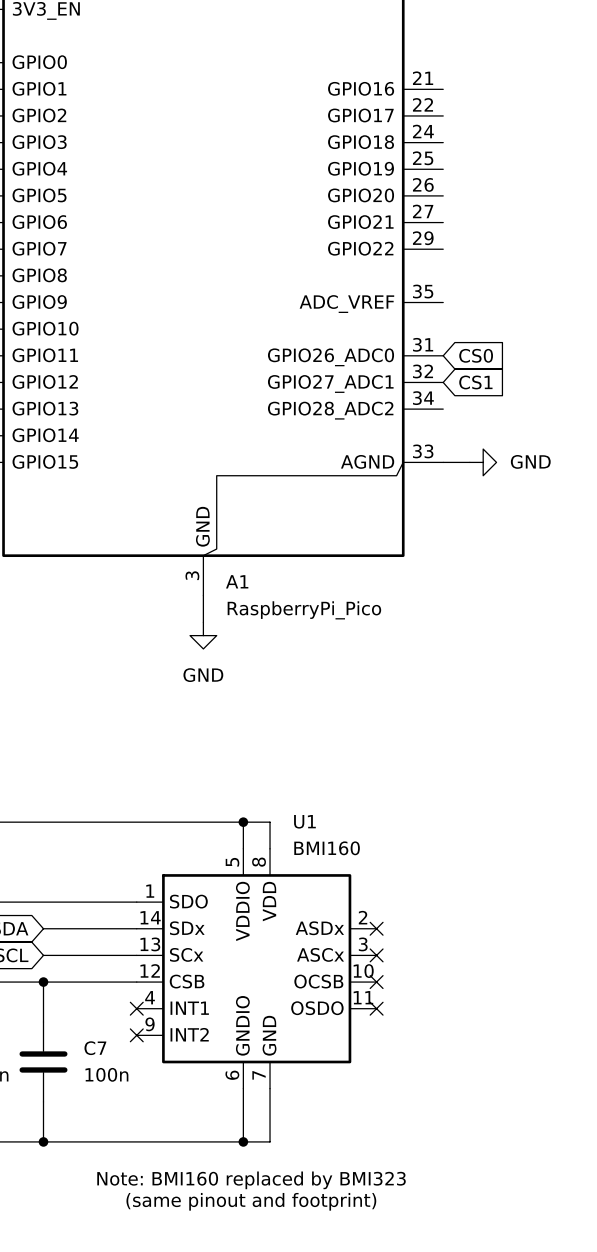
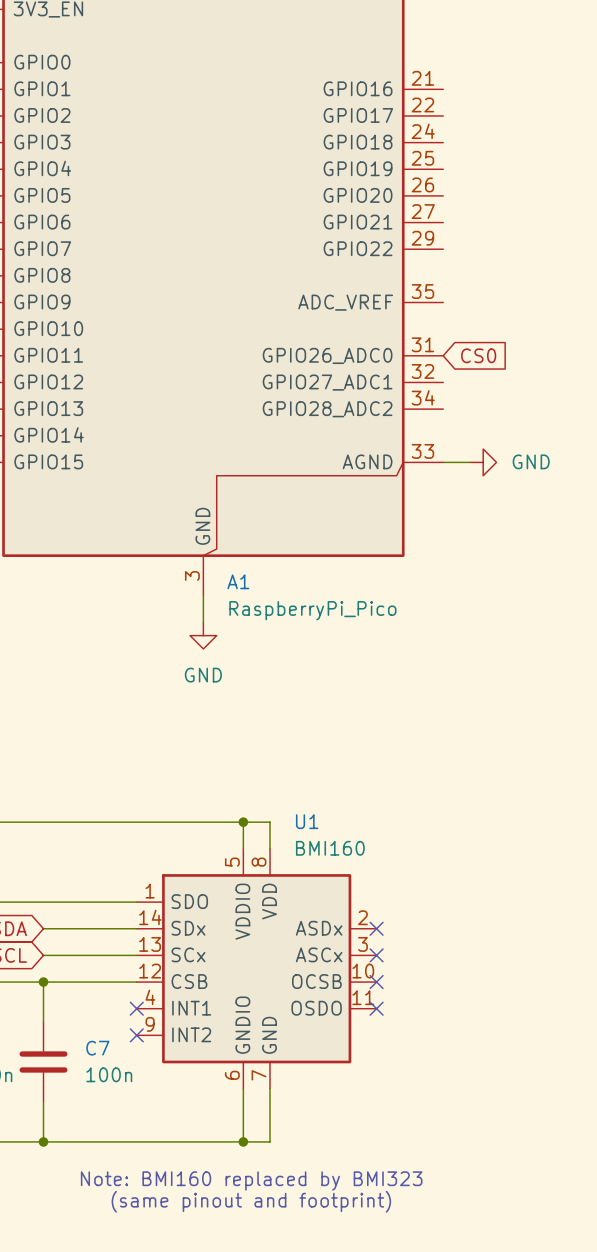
global label: CS1 (475, 382) -> none

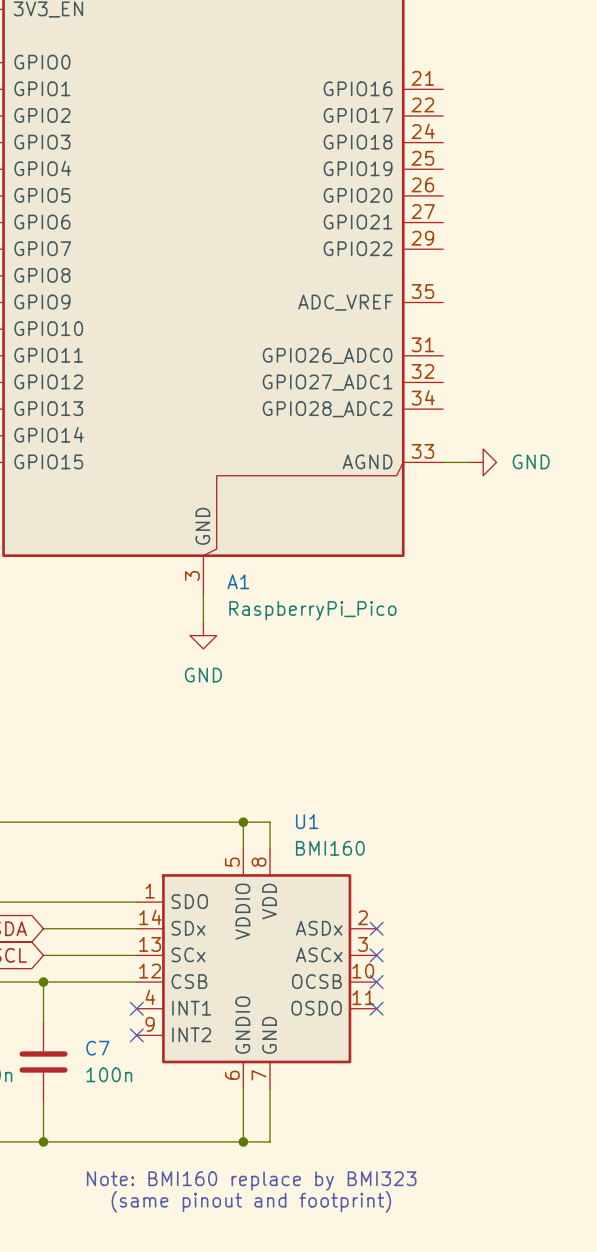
global label: CS0 (478, 355) -> none
text: Note: BMI160 replaced by BMI323 (251, 1180) -> Note: BMI160 replace by BMI323 (251, 1180)

